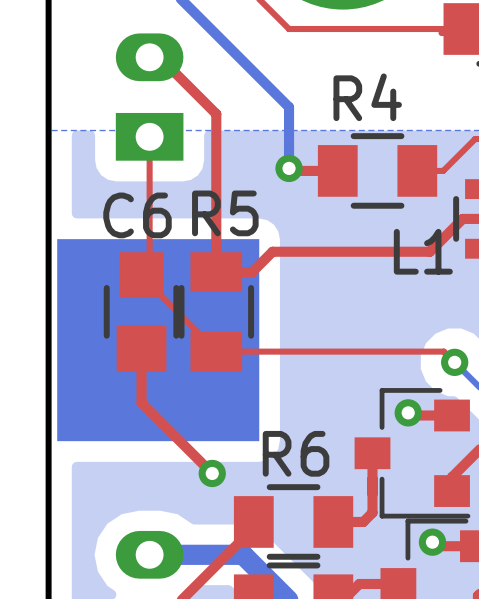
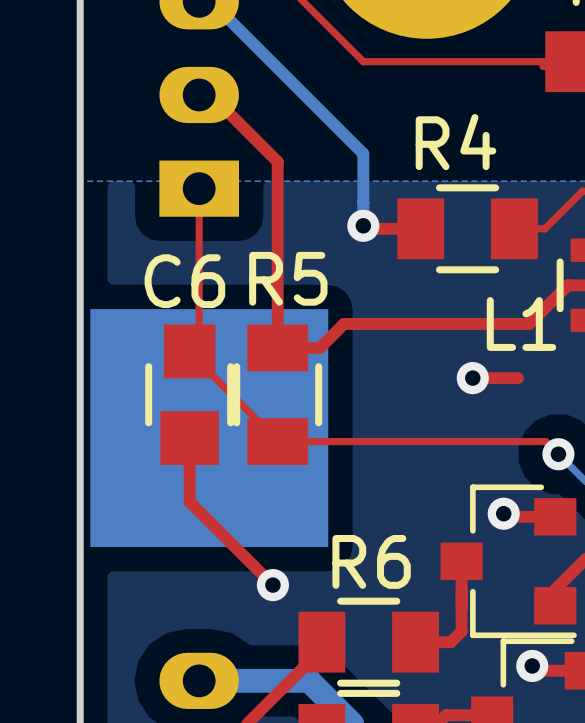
top track: none -> (472, 378) (517, 378)
via: none -> (472, 378)

